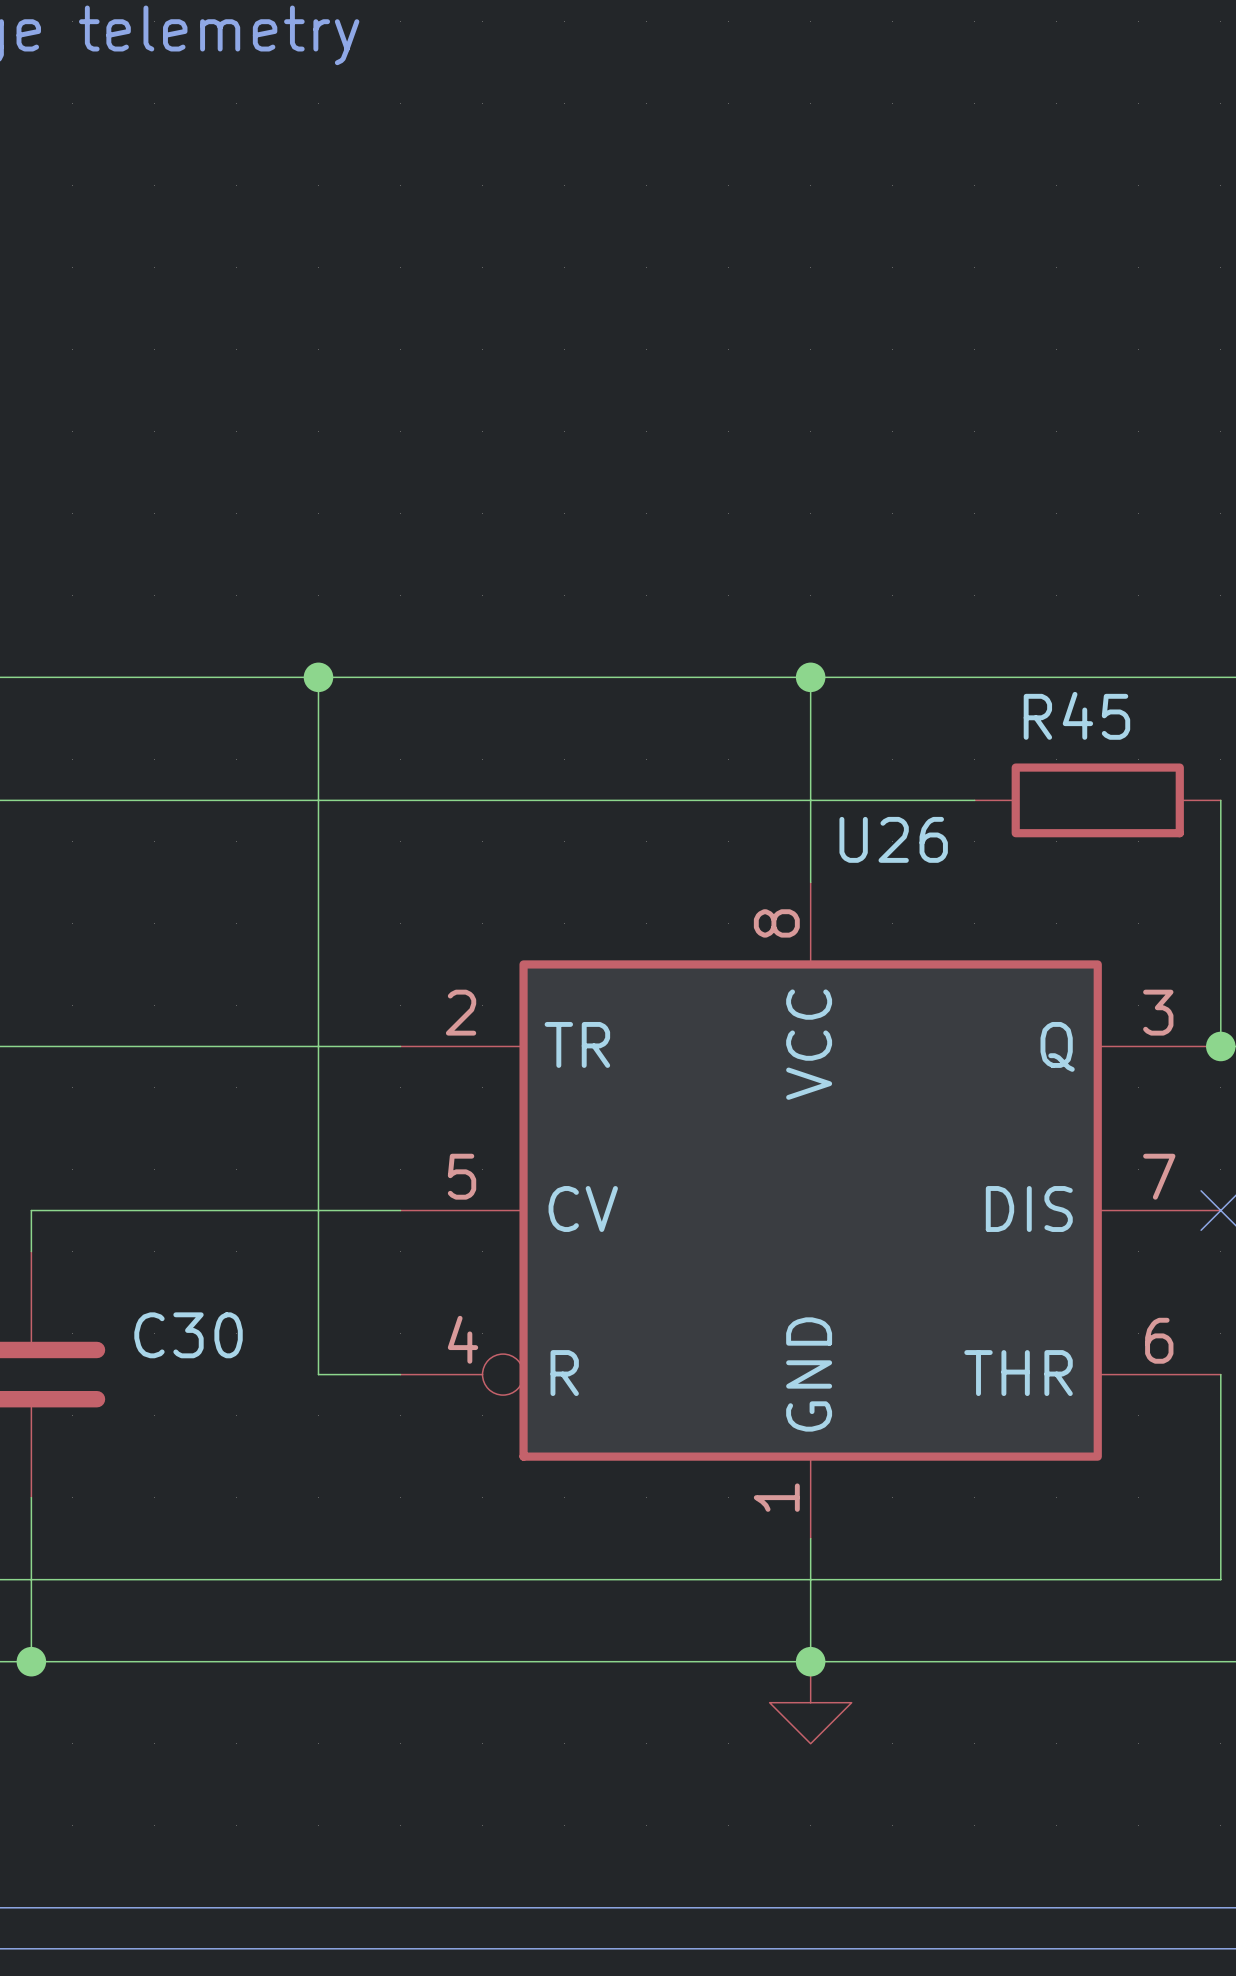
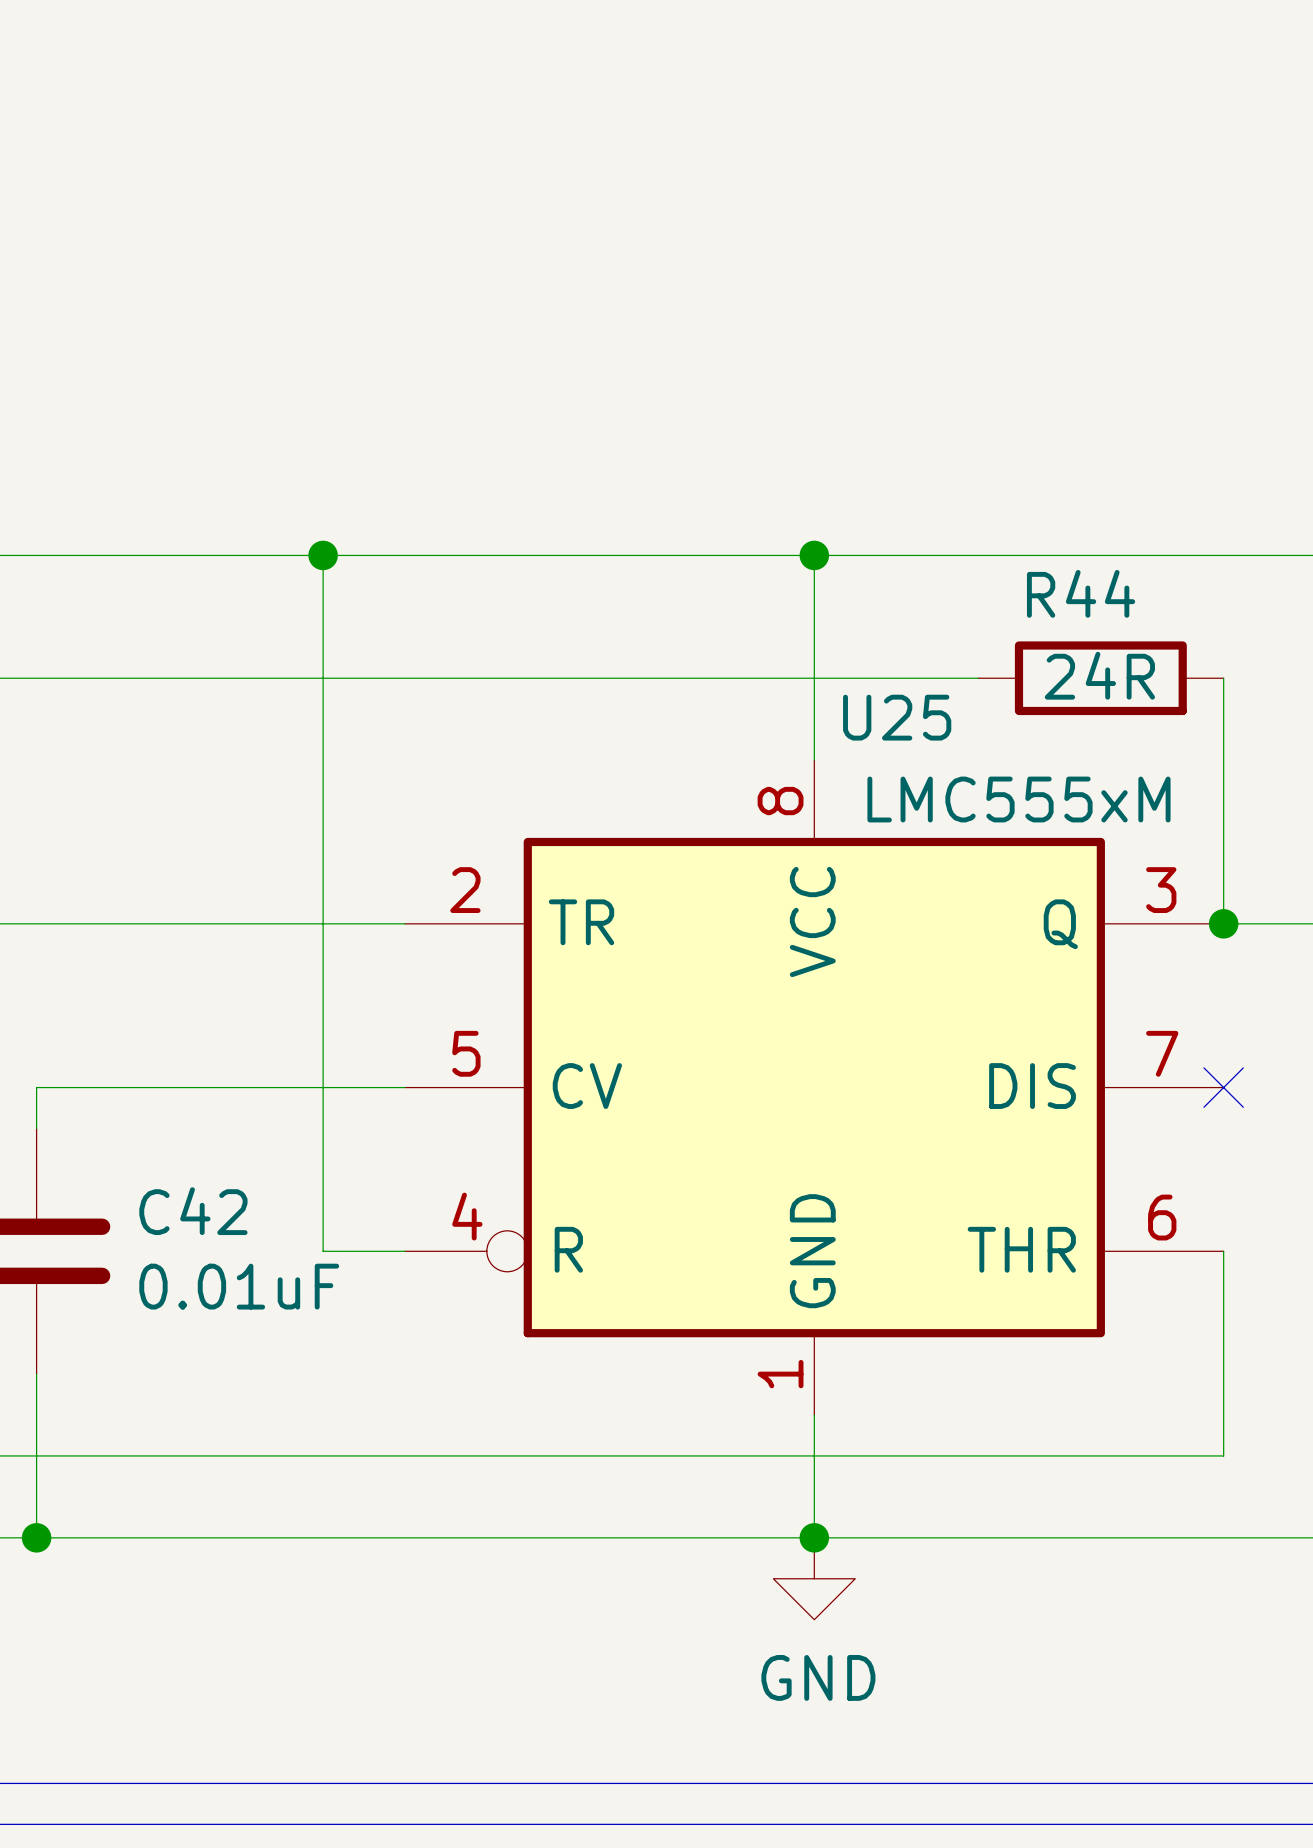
R45 name: R45 (1076, 715) -> R44 (1081, 593)
R45 value: none -> 24R (1099, 675)
U26 name: U26 (893, 839) -> U25 (897, 717)
U26 value: none -> LMC555xM (1018, 799)
C30 name: C30 (188, 1335) -> C42 (193, 1211)
C30 value: none -> 0.01uF (239, 1286)
power symbol text: none -> GND (818, 1677)

